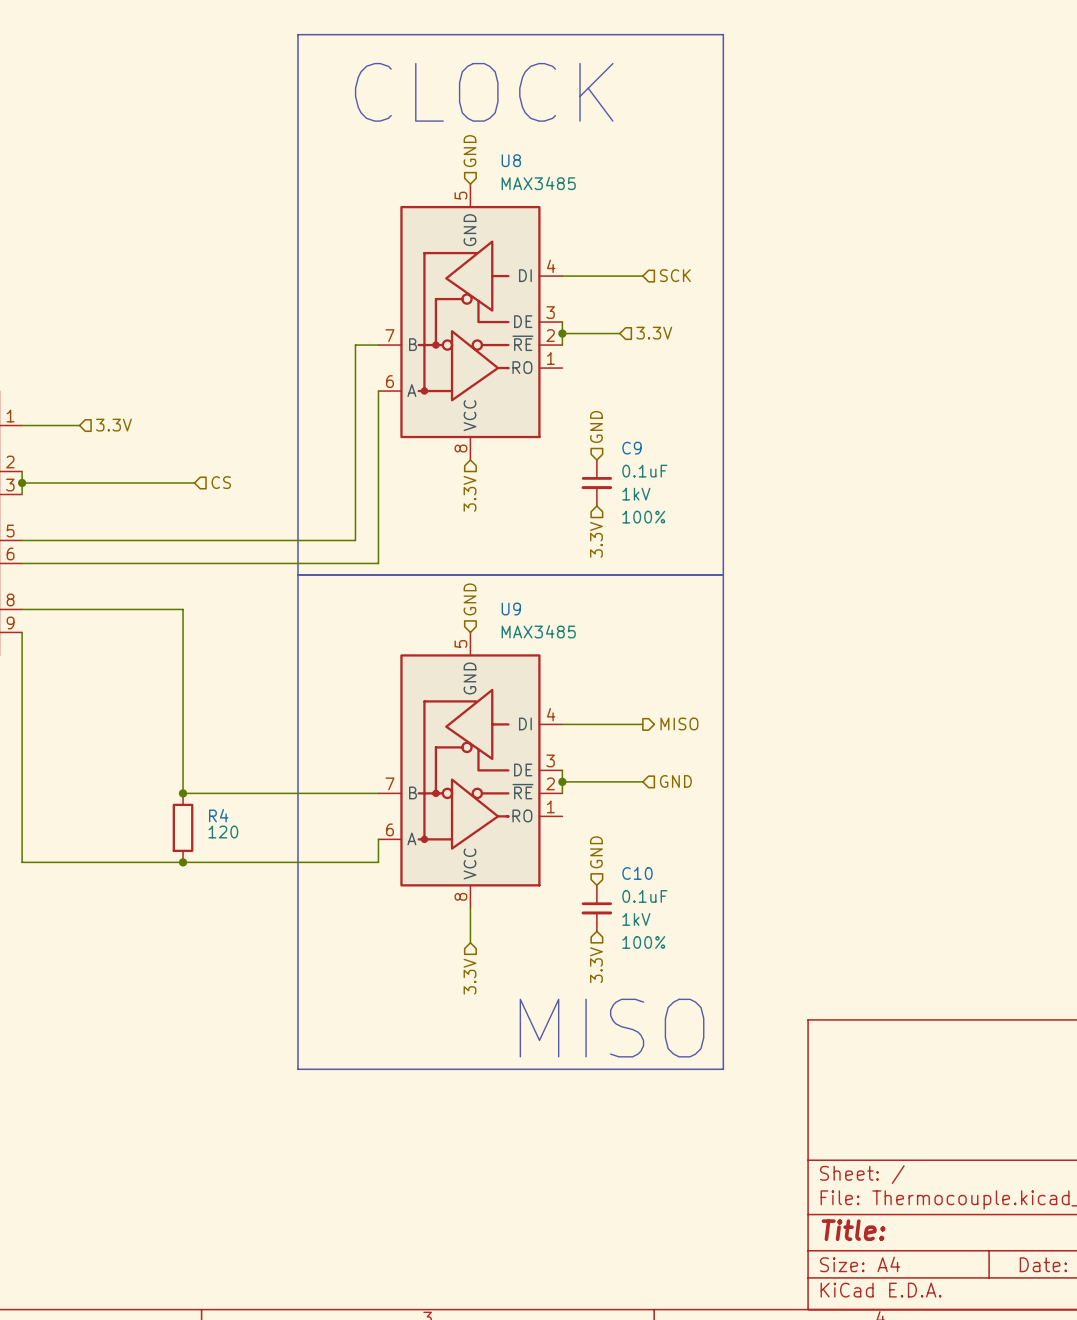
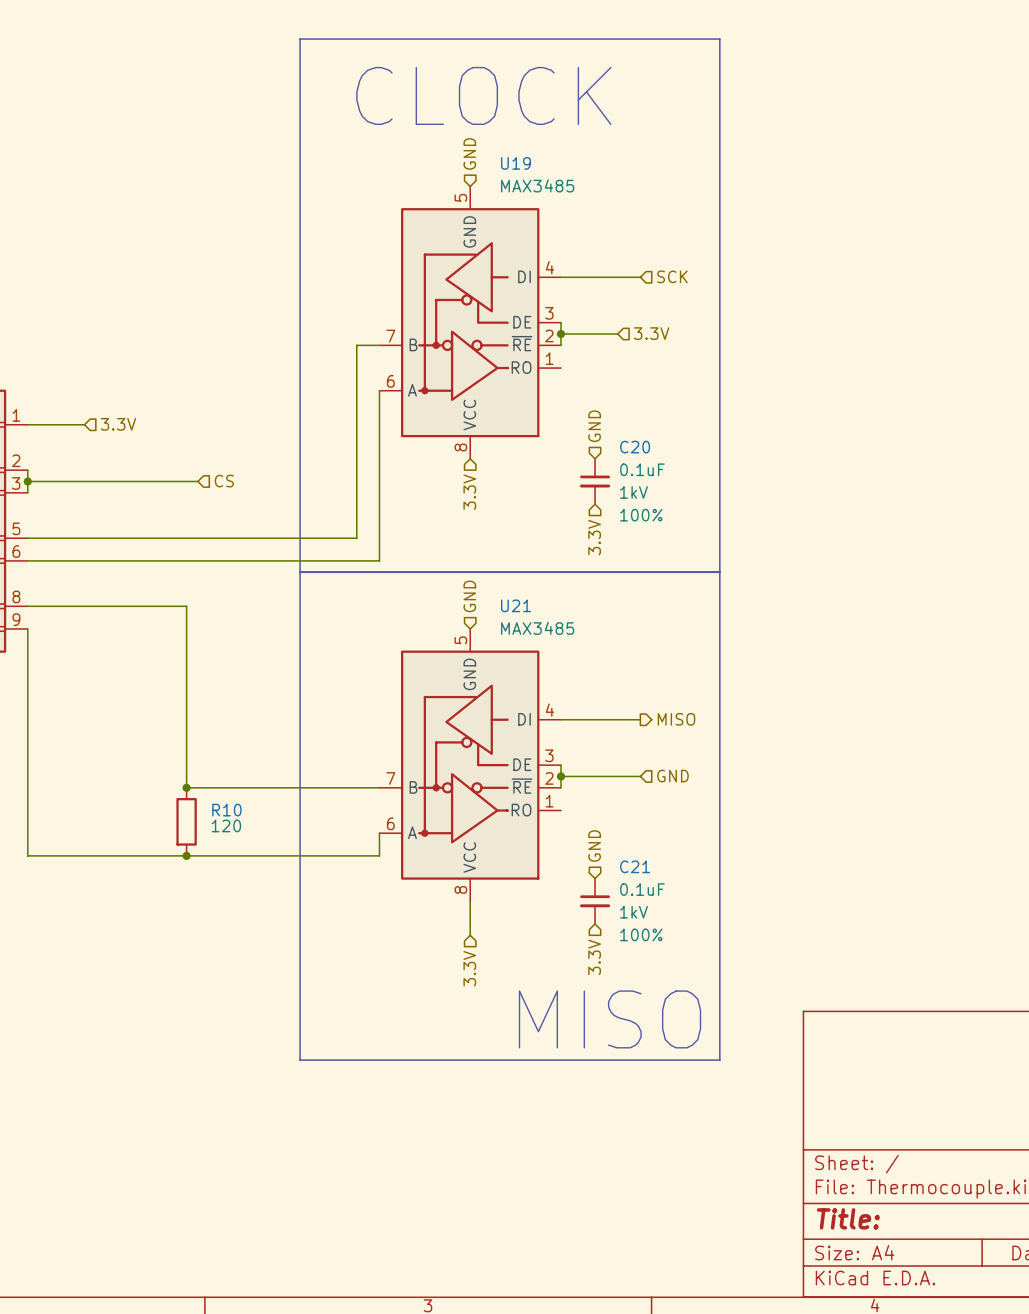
U8 name: U8 (511, 160) -> U19 (516, 163)
C9 name: C9 (632, 448) -> C20 (635, 447)
U9 name: U9 (511, 609) -> U21 (516, 605)
R4 name: R4 (218, 815) -> R10 (226, 810)
C10 name: C10 (637, 873) -> C21 (635, 866)

